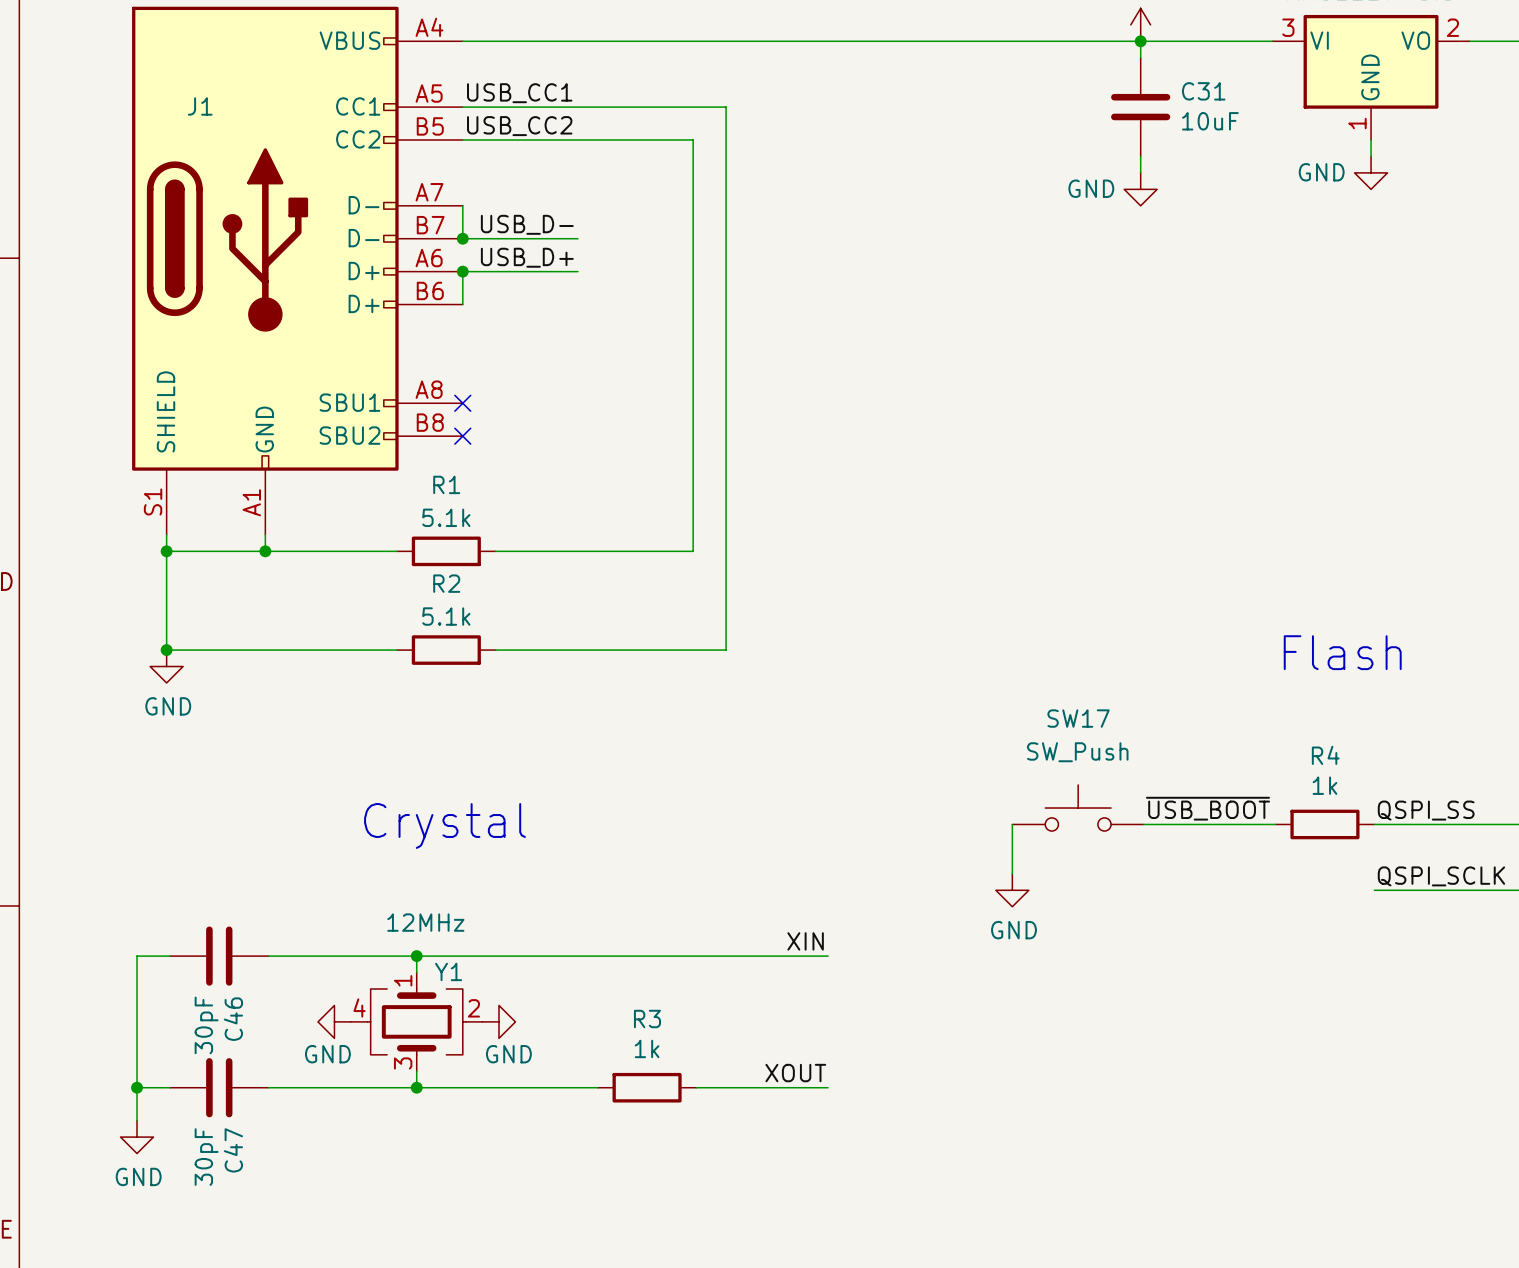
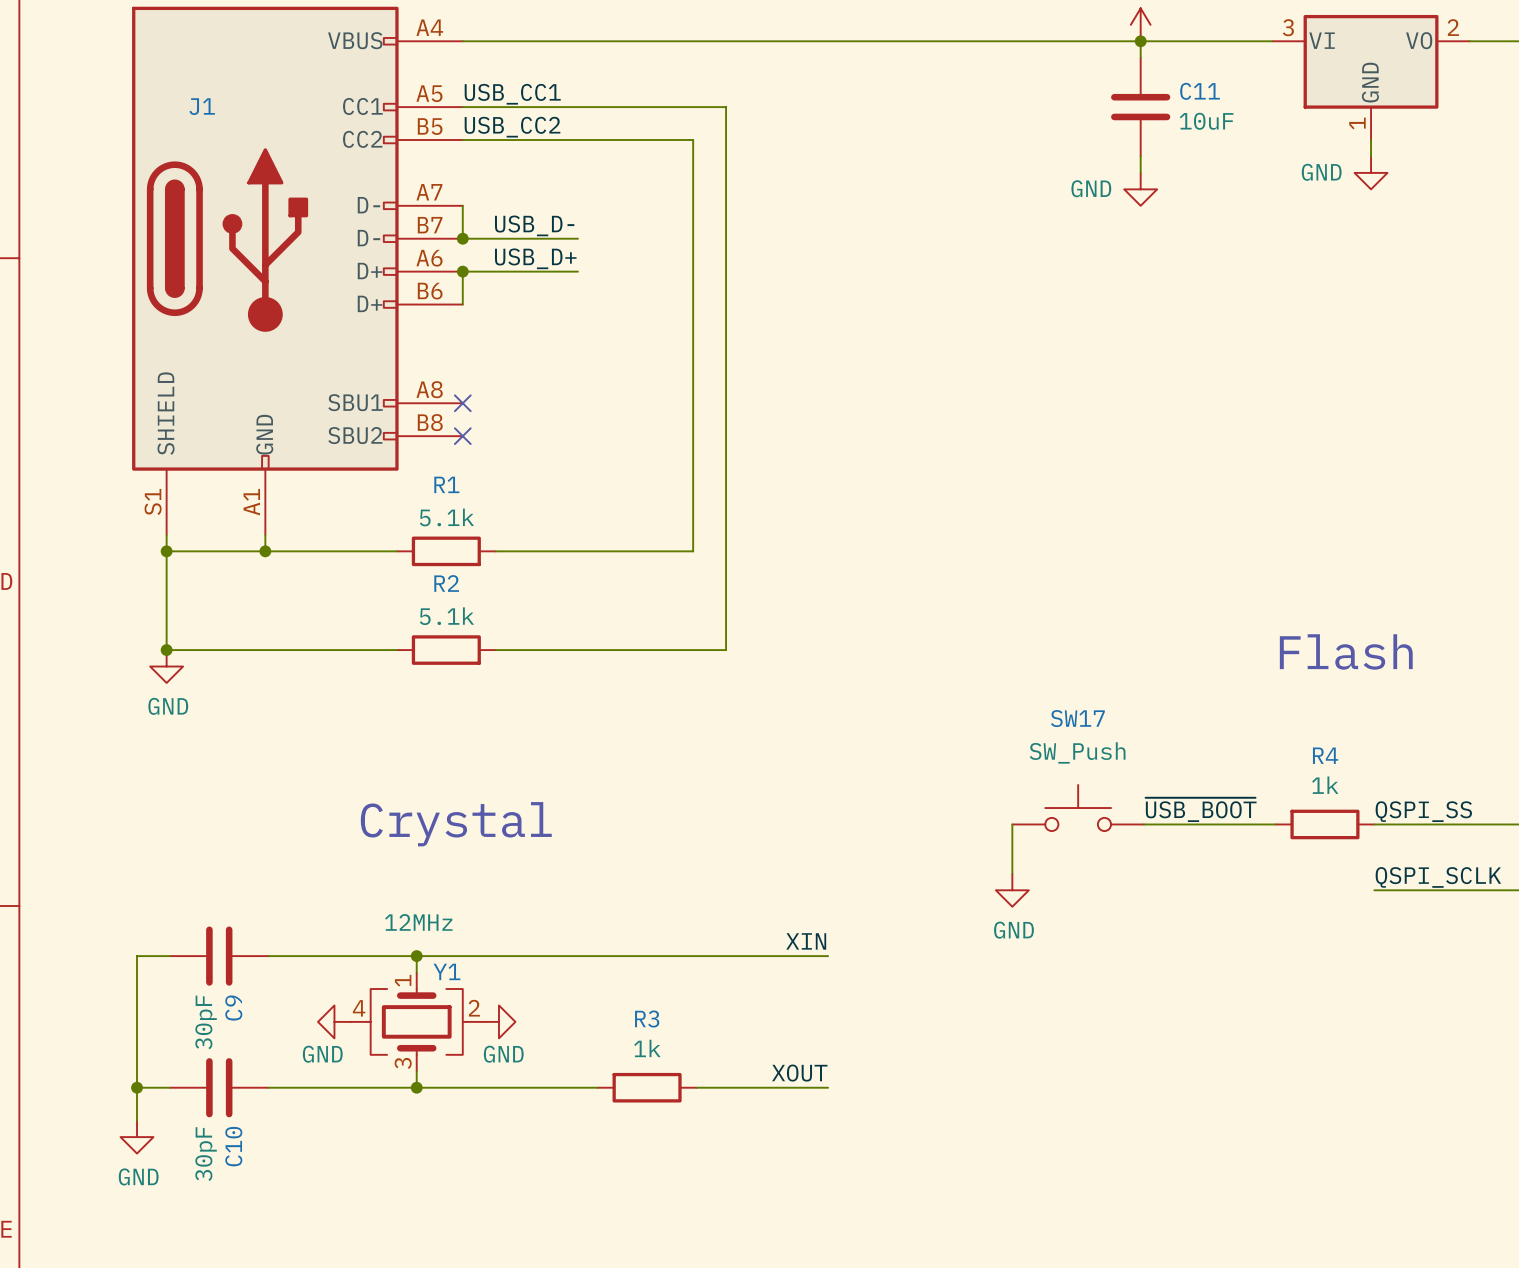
C31 name: C31 (1203, 91) -> C11 (1200, 91)
C46 name: C46 (233, 1019) -> C9 (233, 1008)
C47 name: C47 (233, 1150) -> C10 (233, 1146)

